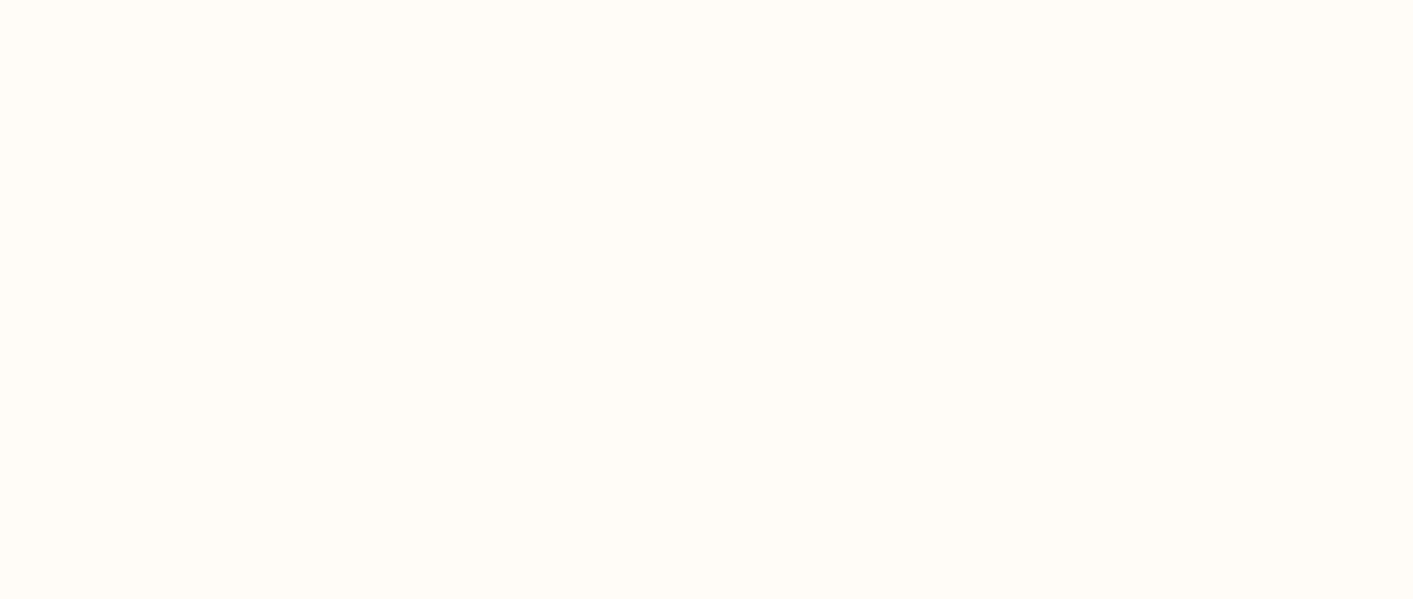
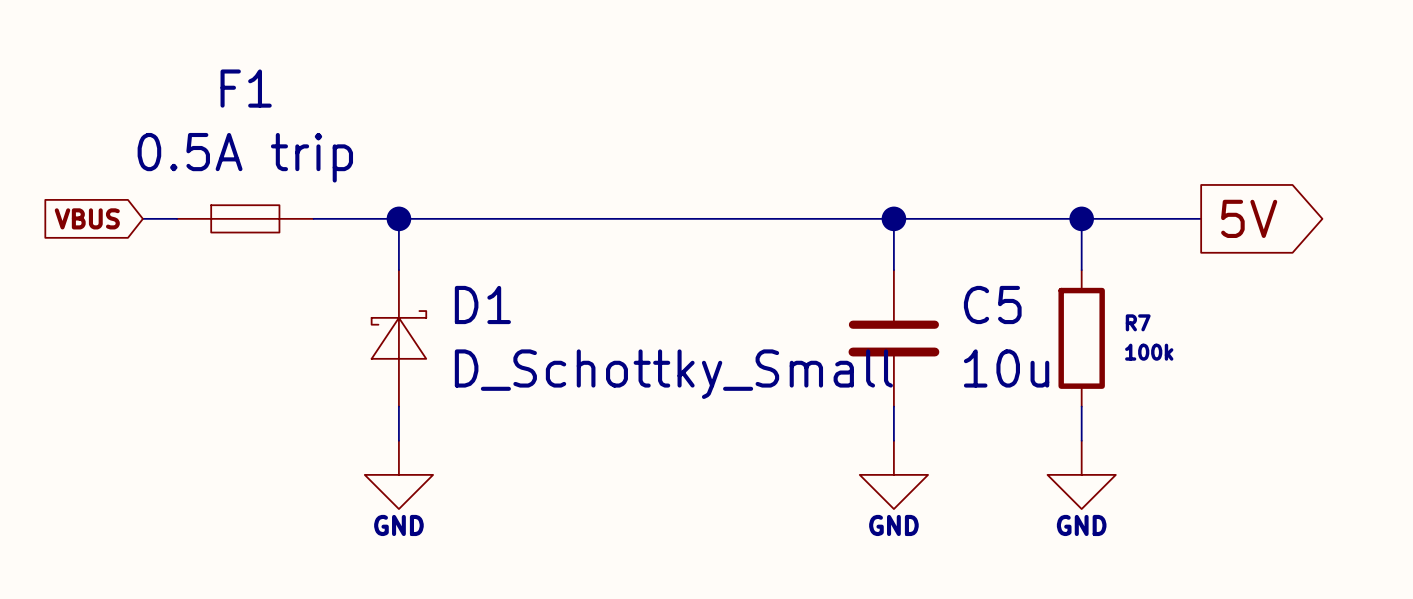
global label: none -> VBUS (87, 218)
wire: none -> (142, 218) (177, 218)
F1: none -> 0.5A trip (245, 218)
wire: none -> (313, 218) (1201, 218)
wire: none -> (398, 218) (398, 270)
junction: none -> (398, 218)
wire: none -> (893, 218) (893, 270)
junction: none -> (893, 218)
wire: none -> (1081, 218) (1081, 270)
junction: none -> (1081, 218)
global label: none -> 5V (1249, 218)
D1: none -> D_Schottky_Small (398, 338)
C5: none -> 10u (893, 338)
R7: none -> 100k (1081, 338)
wire: none -> (398, 406) (398, 440)
wire: none -> (893, 406) (893, 440)
wire: none -> (1081, 406) (1081, 440)
power symbol: none -> GND (398, 474)
power symbol: none -> GND (893, 474)
power symbol: none -> GND (1081, 474)

